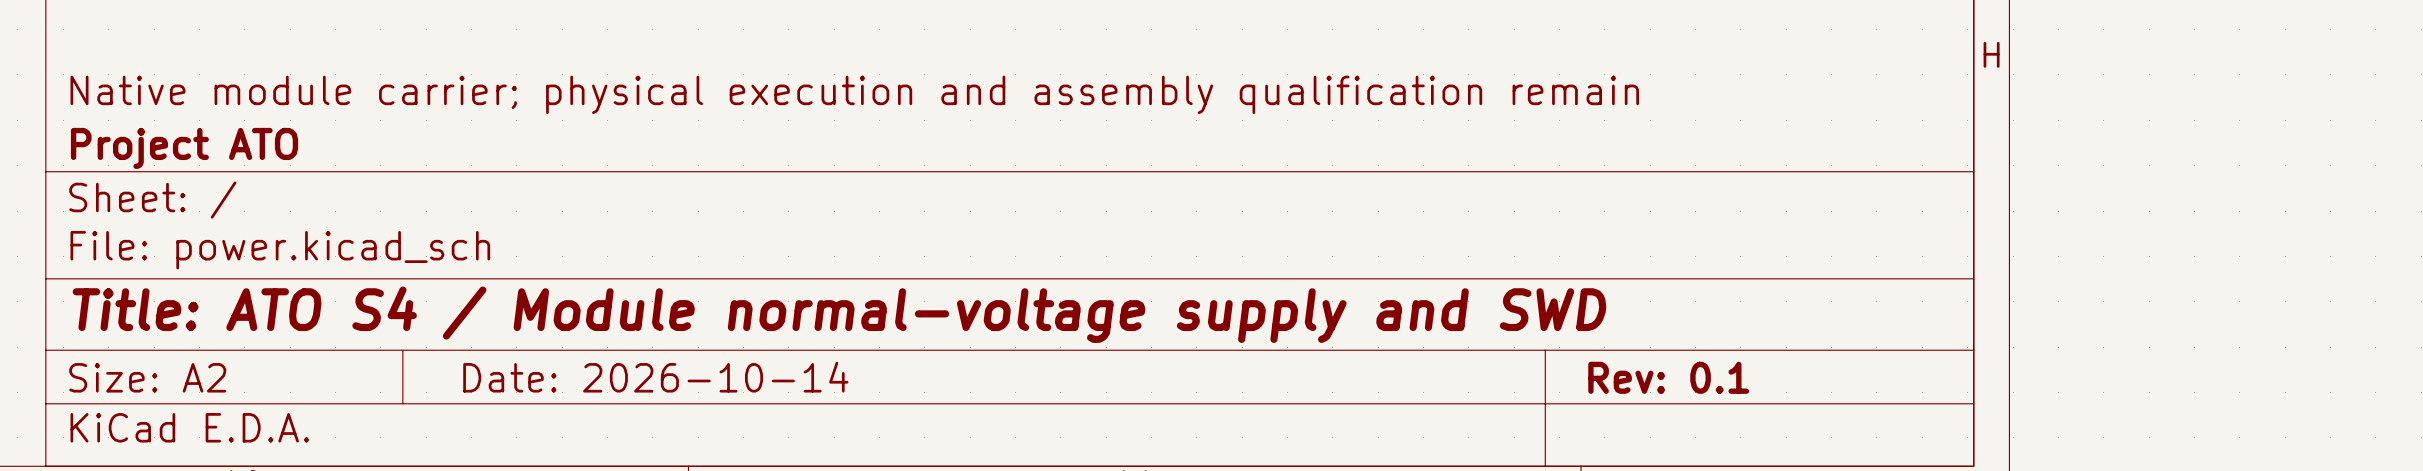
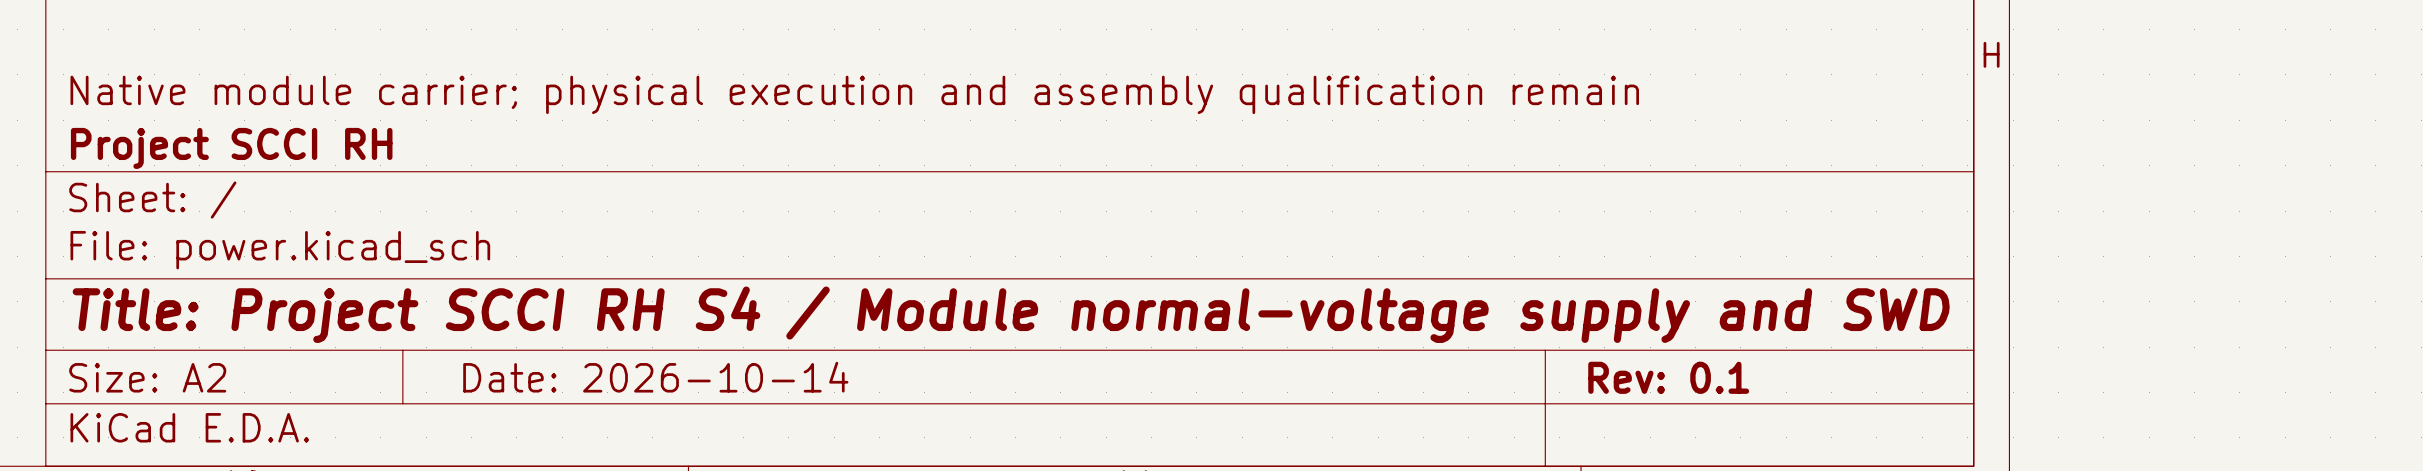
title block: Project ATO (184, 148) -> Project SCCI RH (231, 148)
title block: Title: ATO S4 / Module normal-voltage supply and SWD (839, 314) -> Title: Project SCCI RH S4 / Module normal-voltage supply and SWD (1011, 314)

